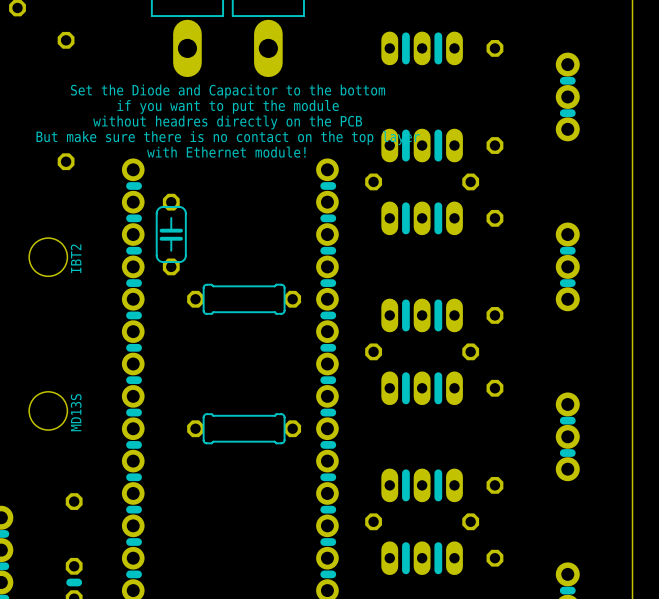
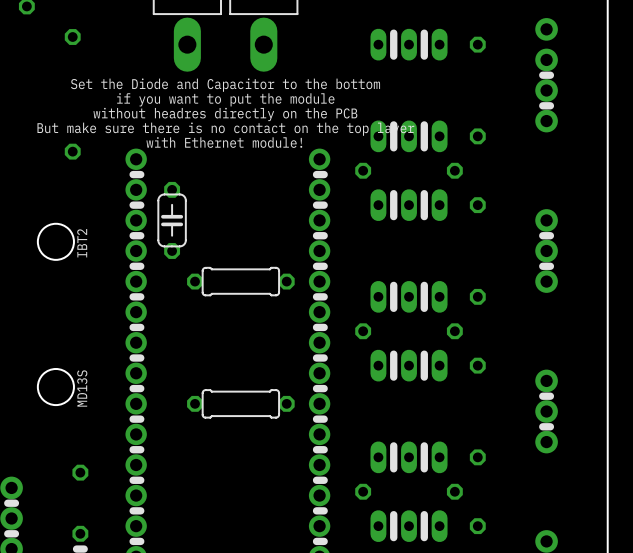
part: none -> (546, 75)

